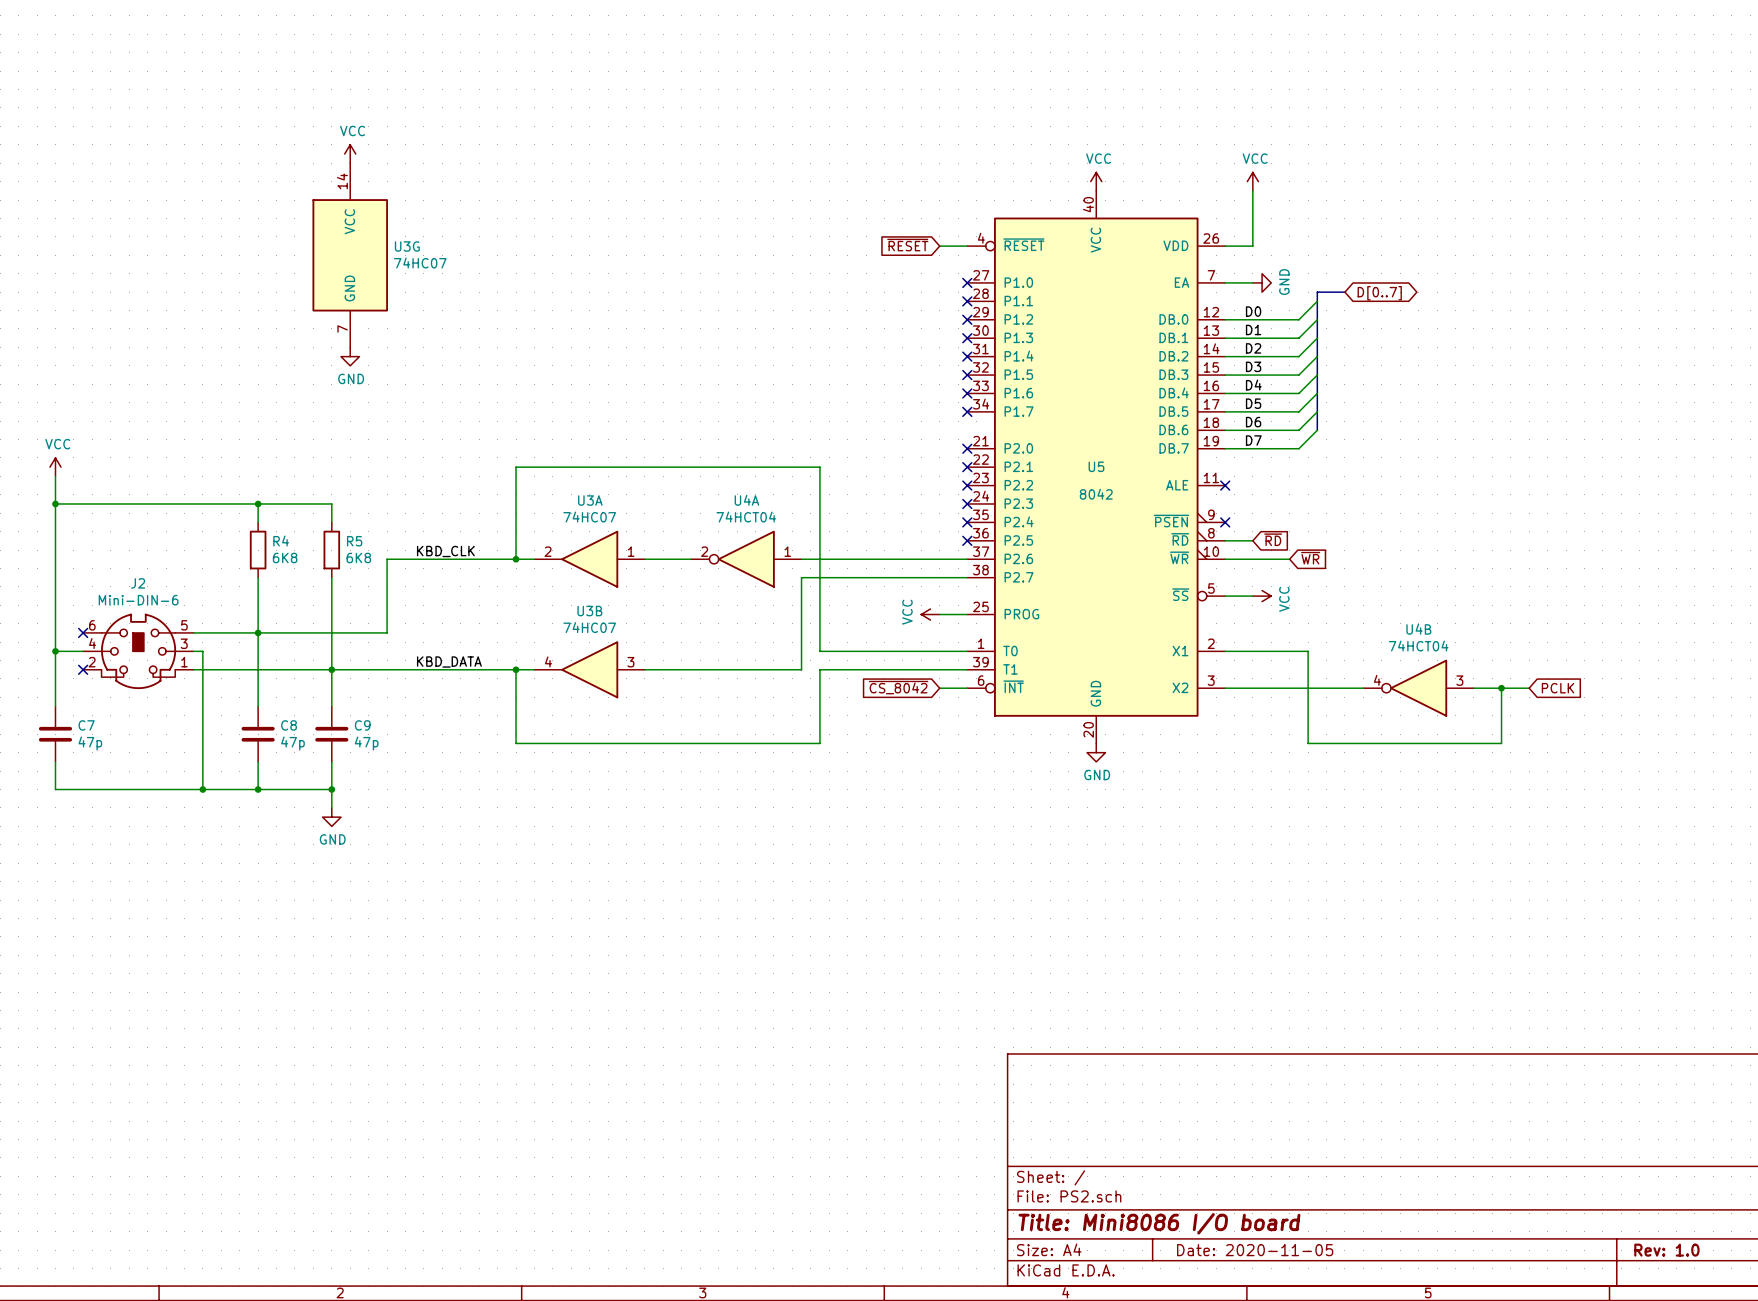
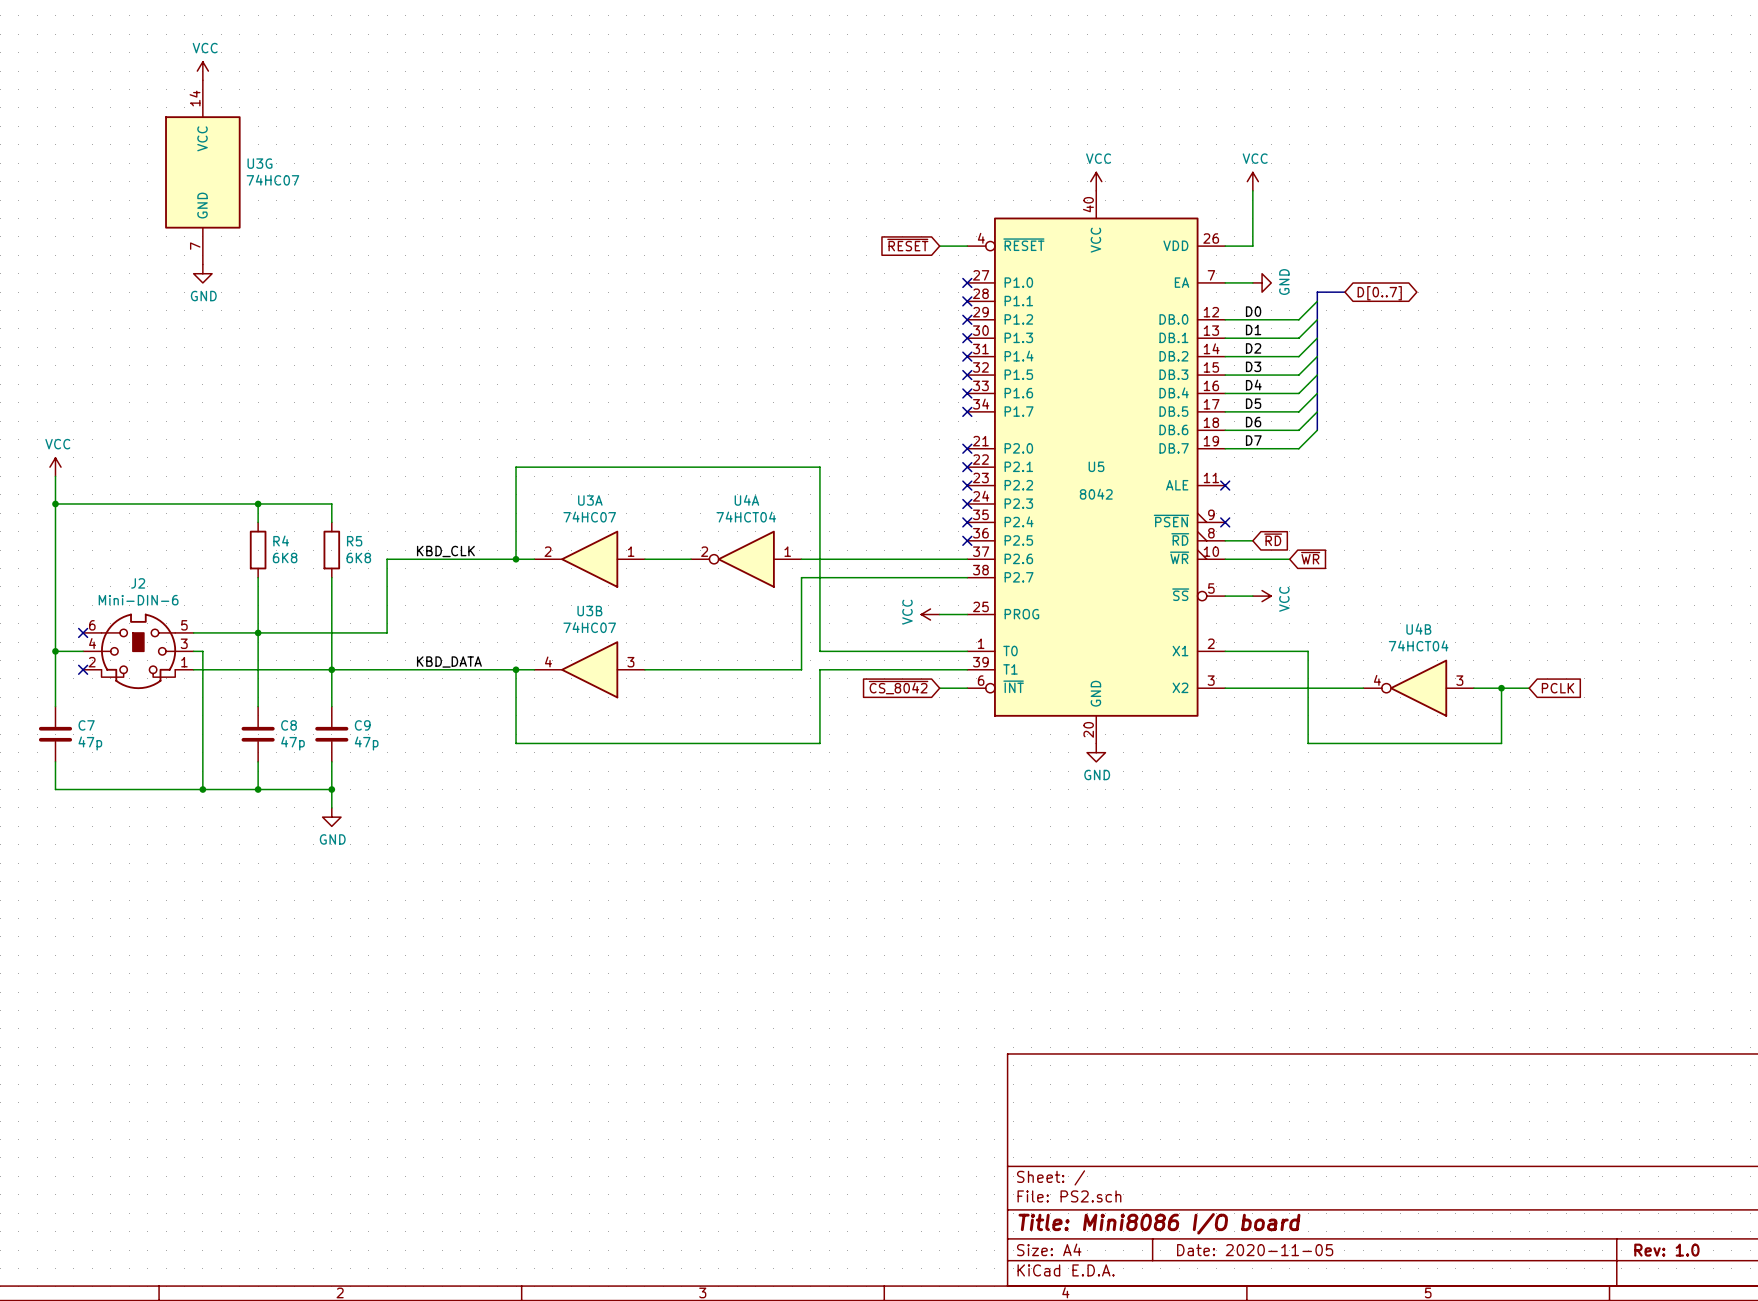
power symbol position: VCC (350, 153) -> VCC (202, 71)
U3G position: (350, 255) -> (202, 172)
power symbol position: GND (350, 356) -> GND (202, 273)

